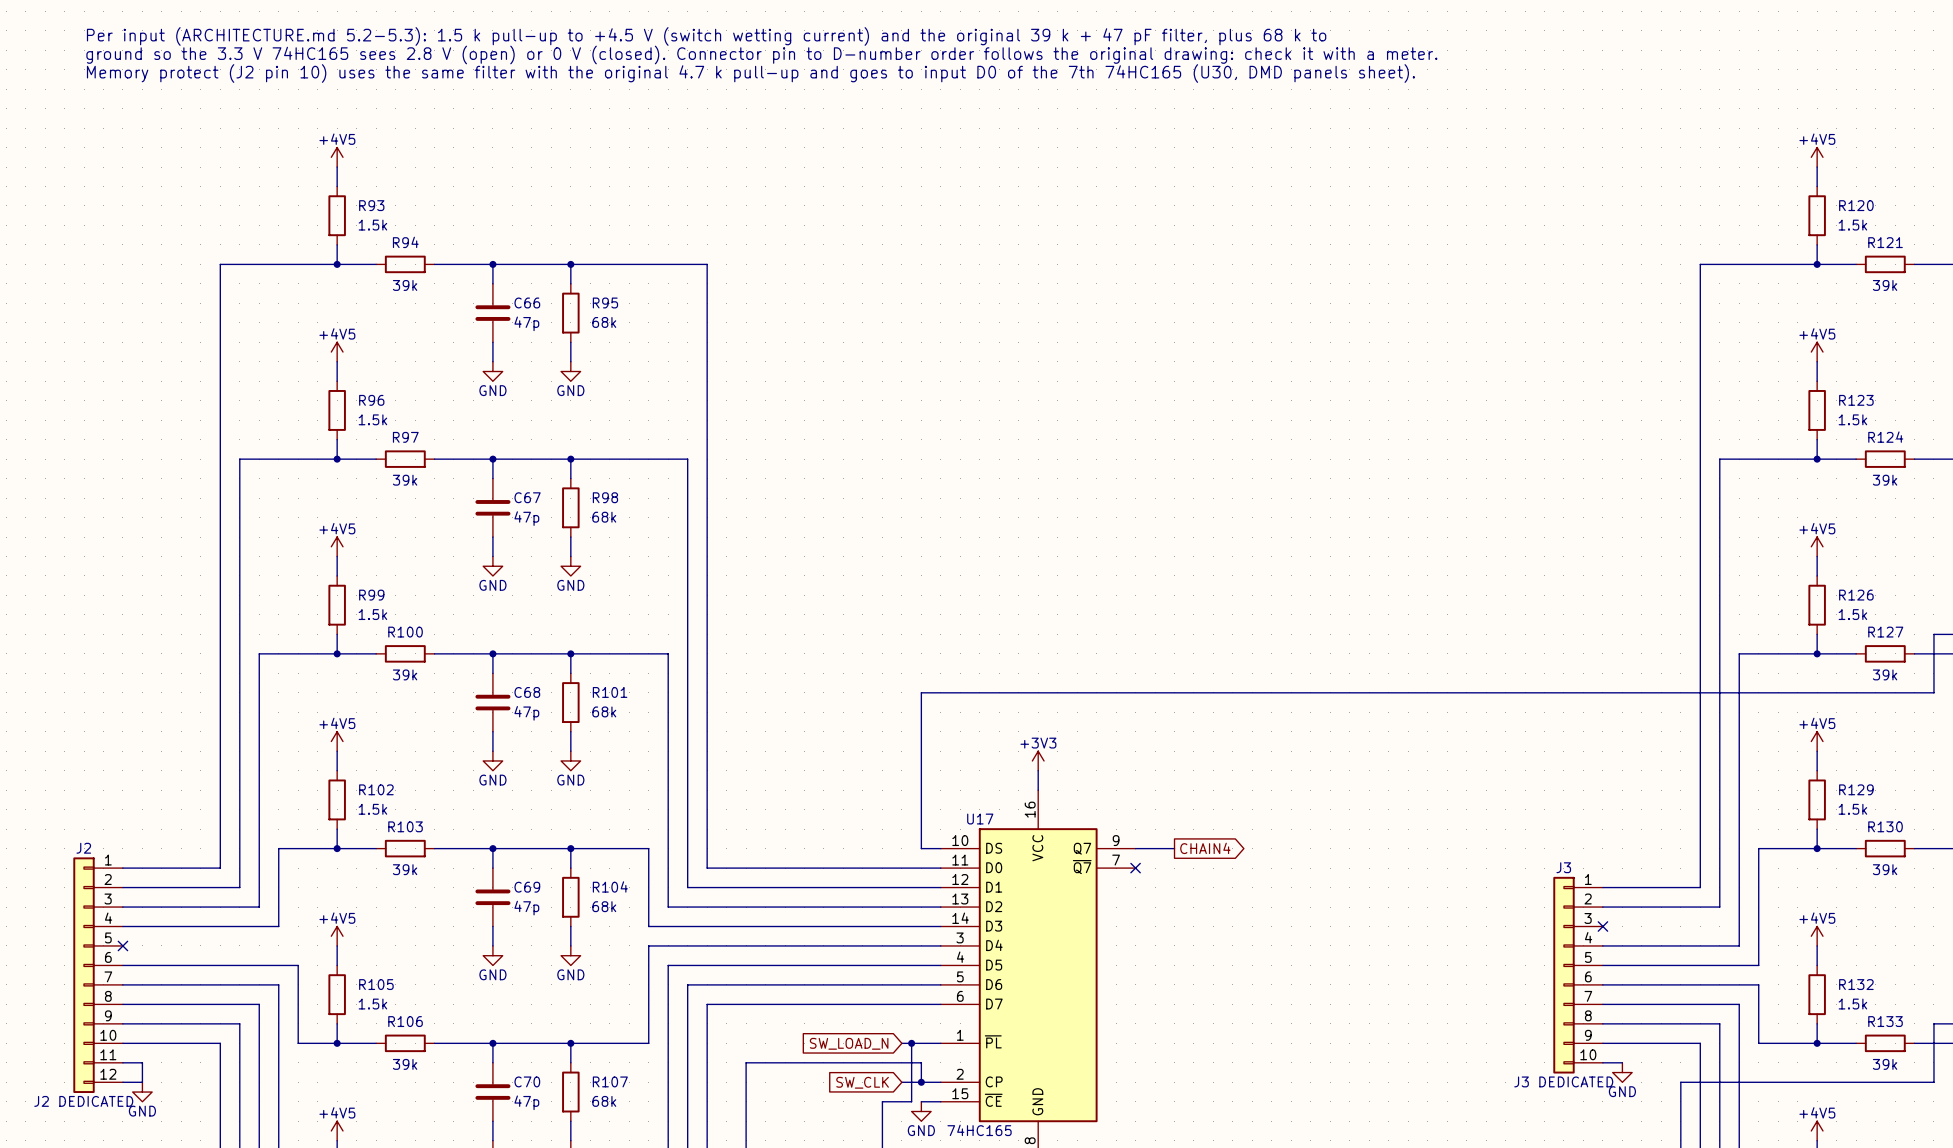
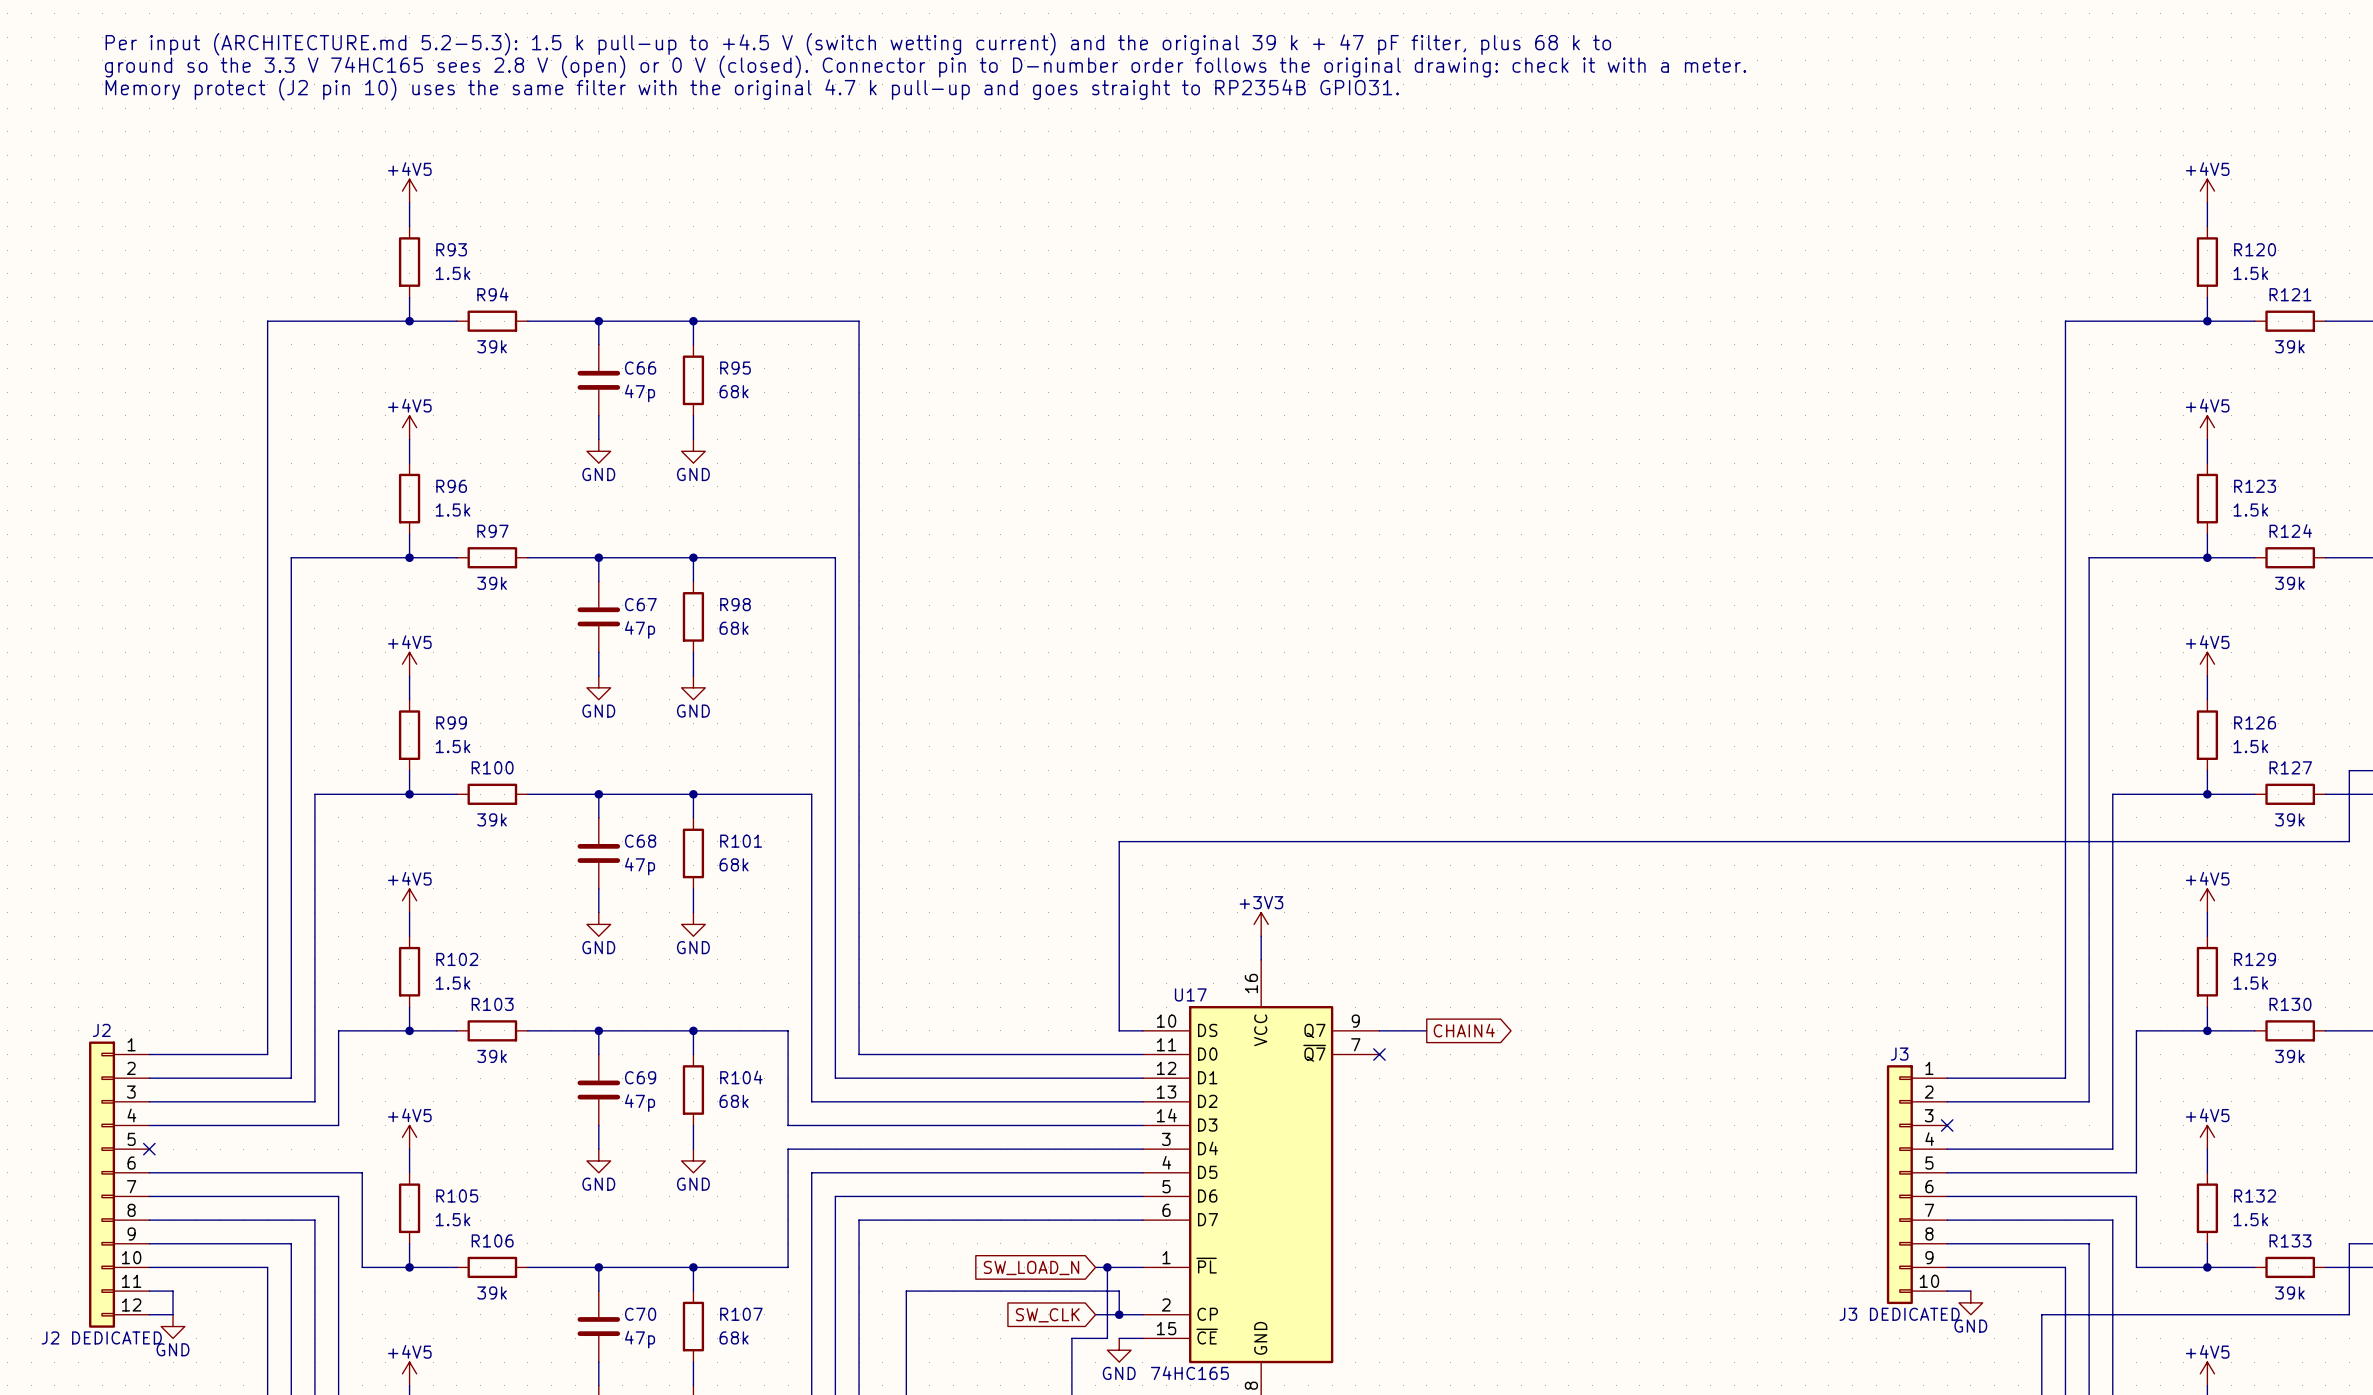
text: Memory protect (J2 pin 10) uses the same filter with the original 4.7 k pull-up and goes to input D0 of the 7th 74HC165 (U30, DMD panels sheet). (750, 73) -> Memory protect (J2 pin 10) uses the same filter with the original 4.7 k pull-up and goes straight to RP2354B GPIO31. (752, 89)

